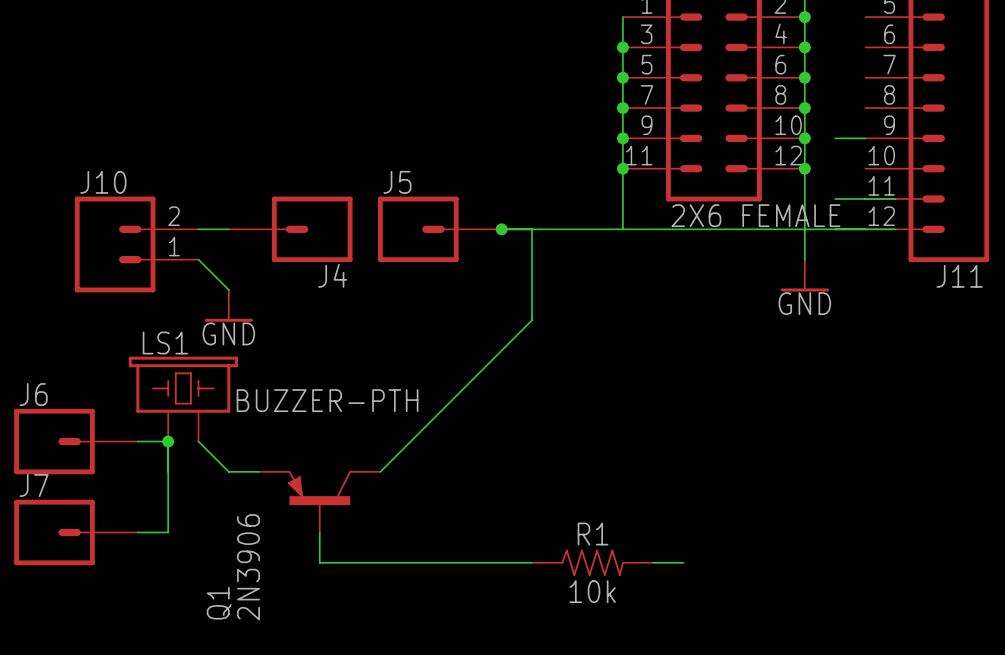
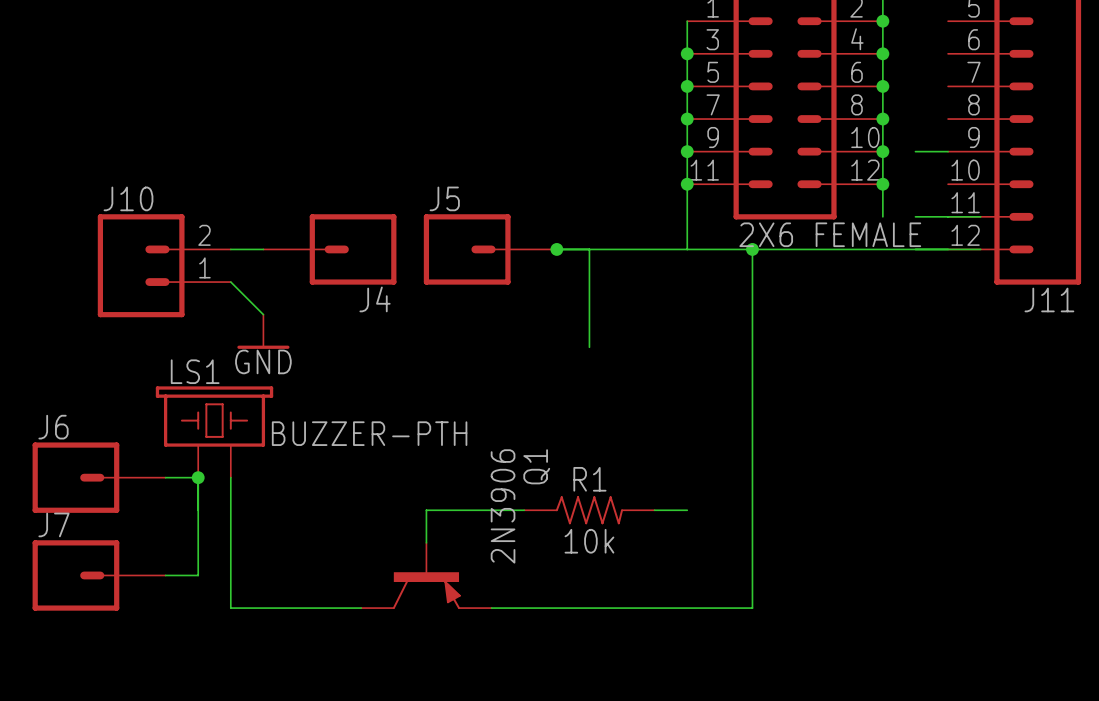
wire: (804, 199) (804, 259) -> none
wire: none -> (752, 249) (752, 608)
junction: none -> (752, 249)
power symbol: GND (804, 275) -> none
wire: (531, 320) (380, 471) -> none
wire: (198, 441) (228, 471) (259, 471) -> (230, 477) (230, 608) (361, 608)
wire: none -> (524, 510) (426, 510) (426, 542)
wire: none -> (654, 510) (687, 510)
Q1 rotation: 0° (319, 488) -> 180° (426, 590)
wire: (319, 532) (319, 562) (441, 562) -> none
R1 position: (592, 562) -> (589, 510)

